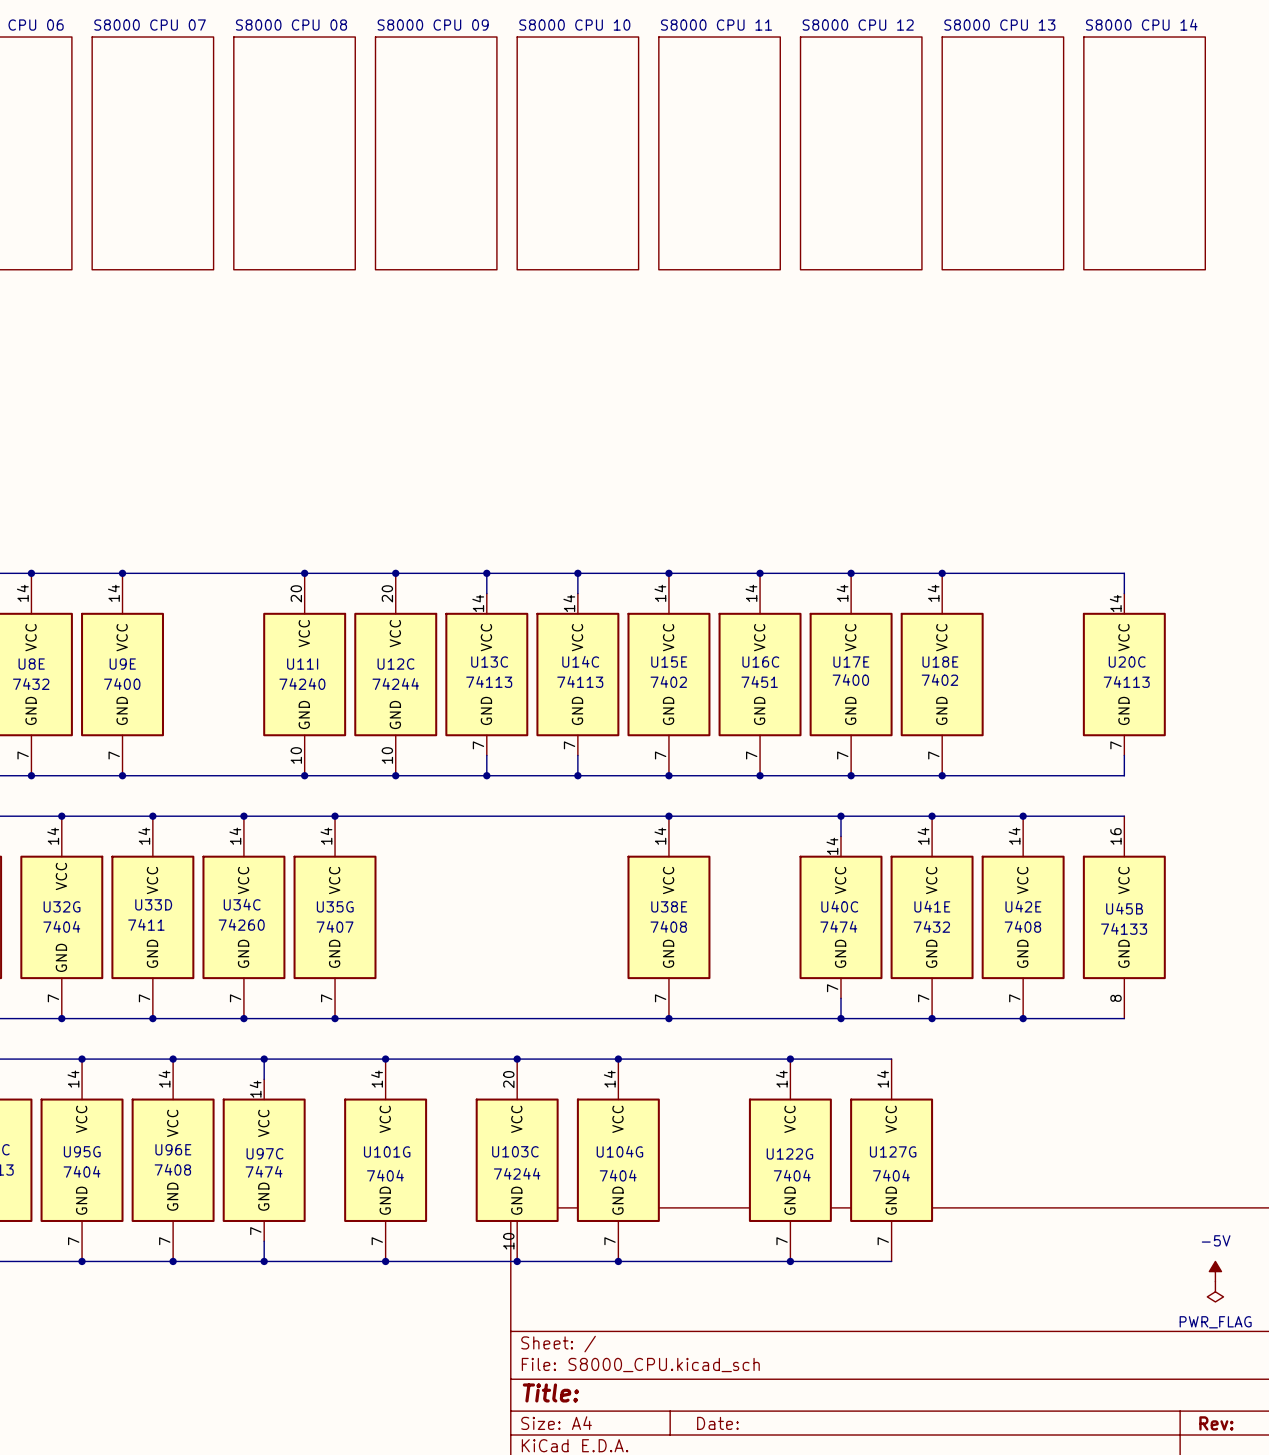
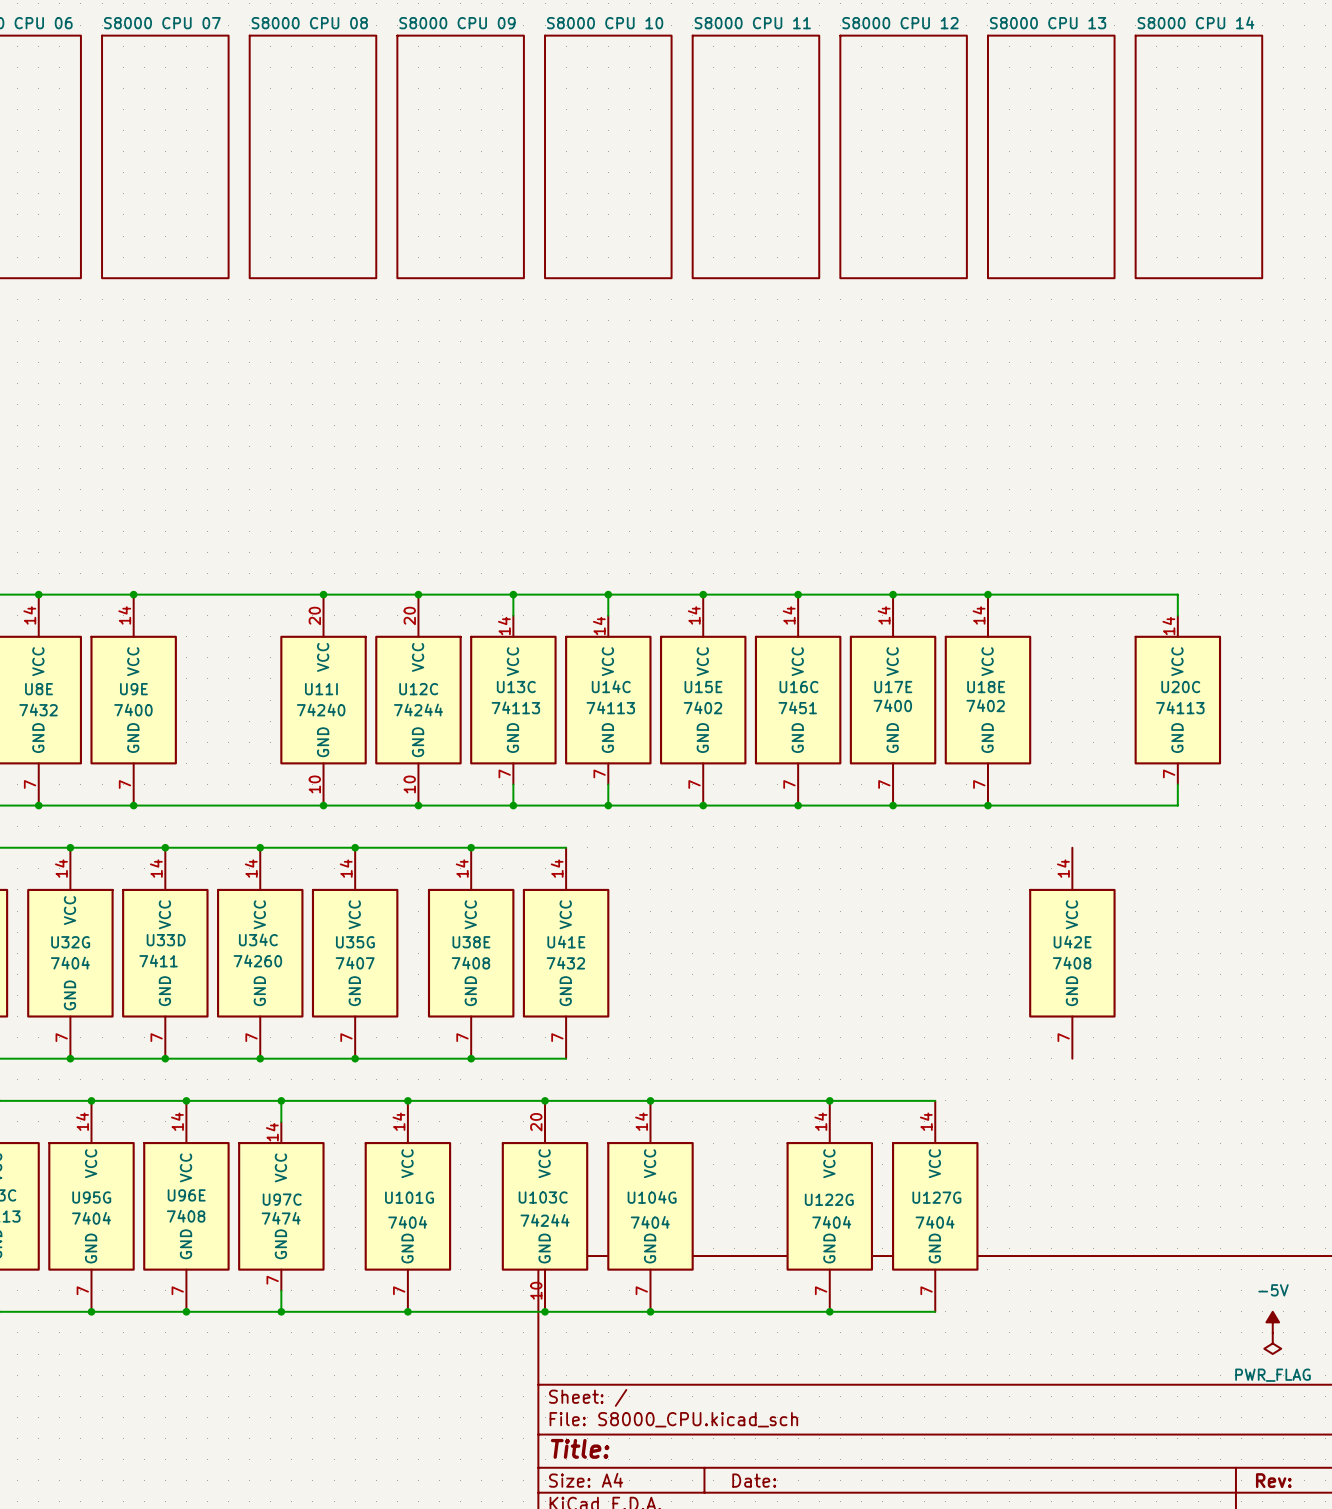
junction: none -> (471, 847)
wire: (537, 816) (1124, 816) -> none
junction: (668, 816) -> none
wire: (840, 816) (840, 836) -> none
junction: (840, 816) -> none
junction: (932, 816) -> none
junction: (1023, 816) -> none
U38E position: (668, 917) -> (471, 953)
U40C: 7474 (840, 917) -> none
U41E position: (932, 917) -> (566, 953)
U45B: 74133 (1124, 917) -> none
wire: (840, 998) (840, 1018) -> none
junction: none -> (471, 1058)
wire: (537, 1018) (1124, 1018) -> none
junction: (668, 1018) -> none
junction: (840, 1018) -> none
junction: (932, 1018) -> none
junction: (1023, 1018) -> none

